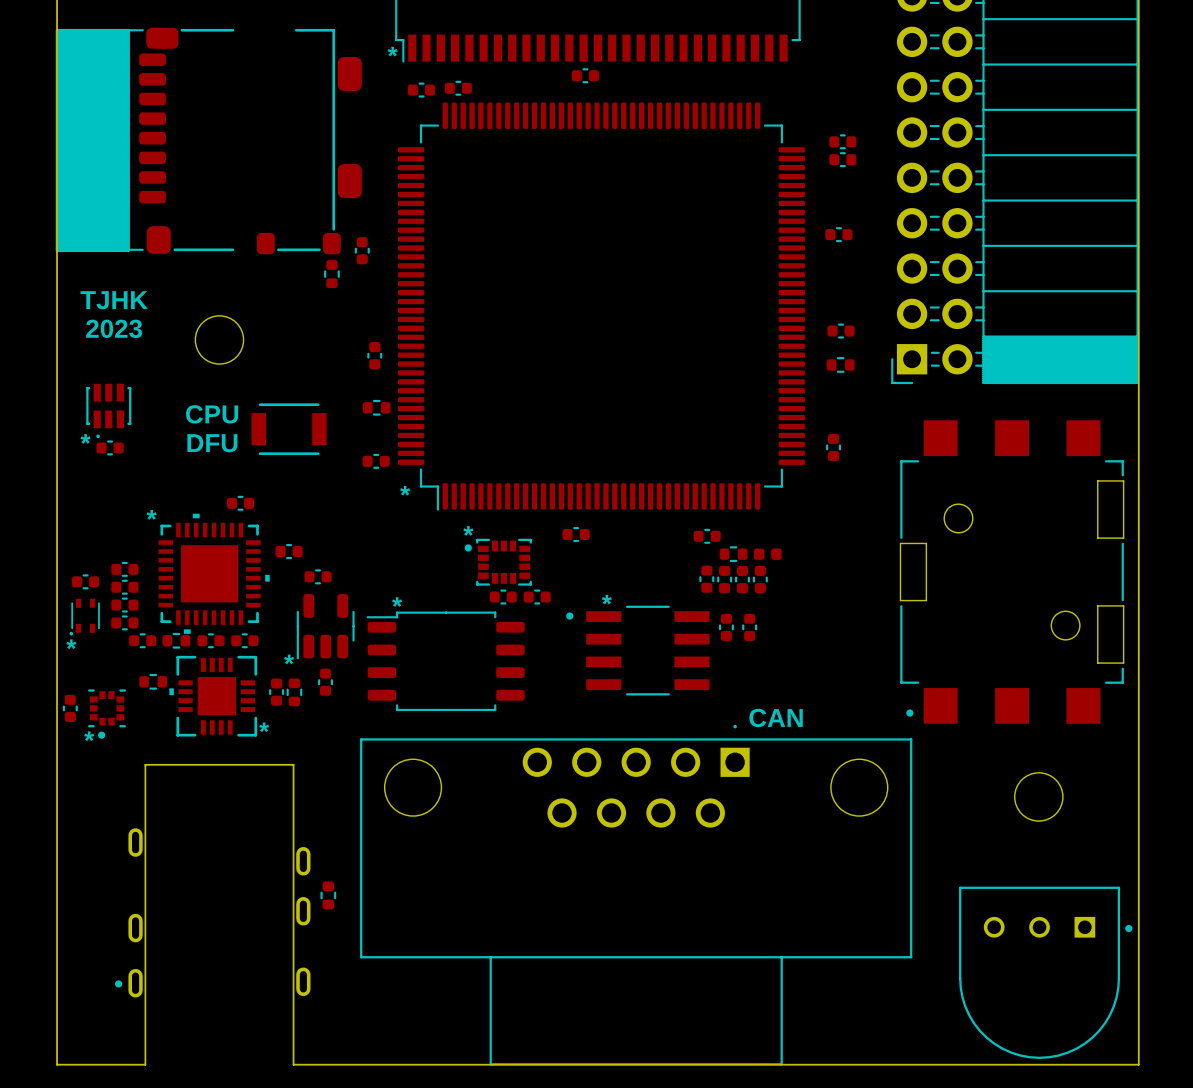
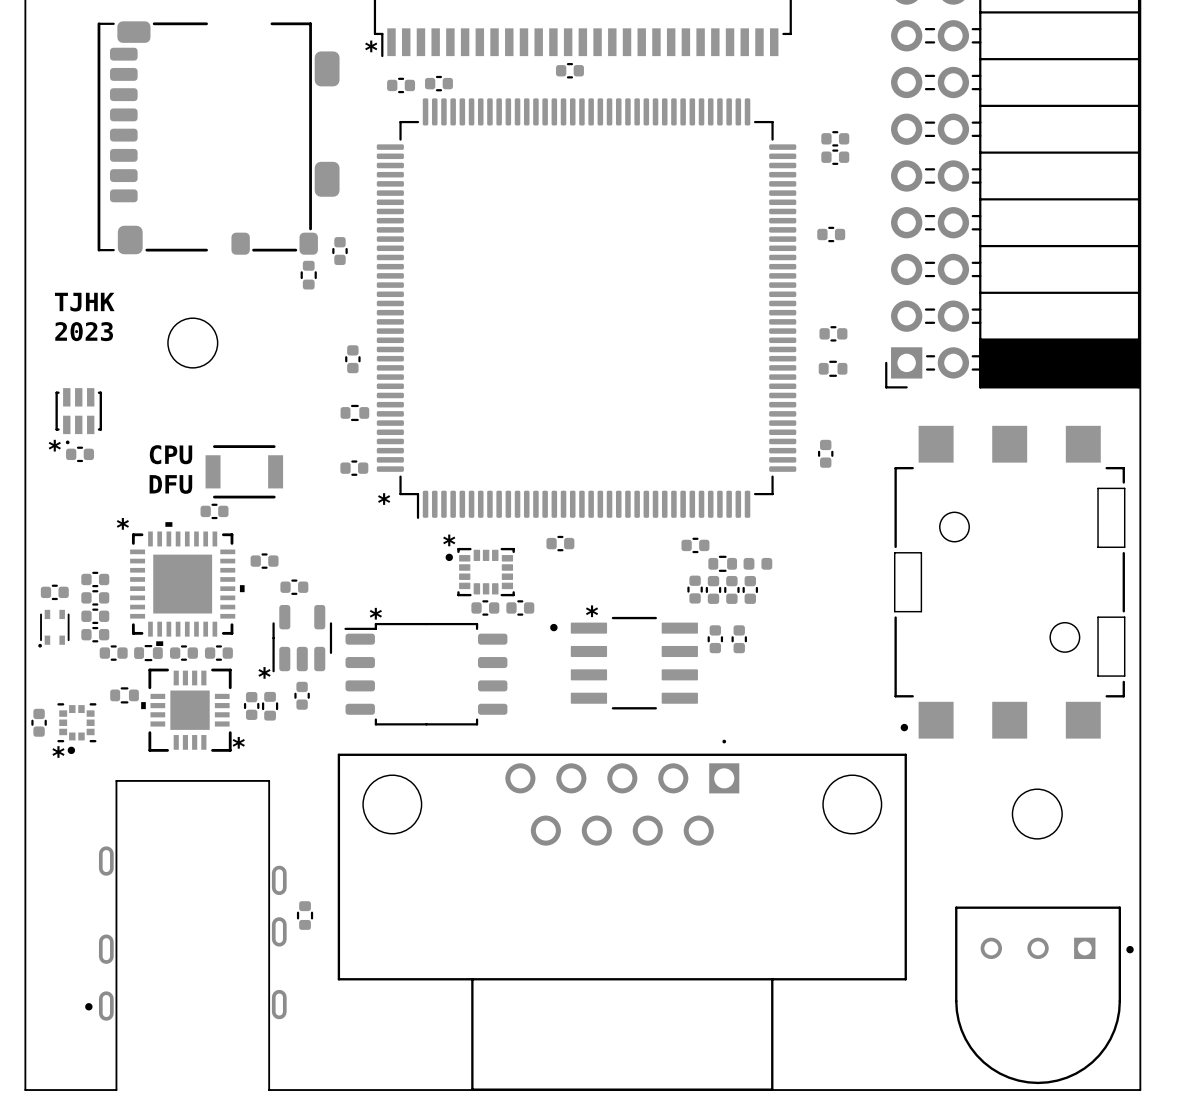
drawing: [55, 28, 130, 253] -> none
text: CPU (212, 414) -> none
part position: (289, 429) -> (244, 471)
text: DFU (212, 443) -> CPU (171, 454)
text: none -> DFU (170, 484)
text: * (71, 644) -> none
text: CAN (776, 717) -> none

